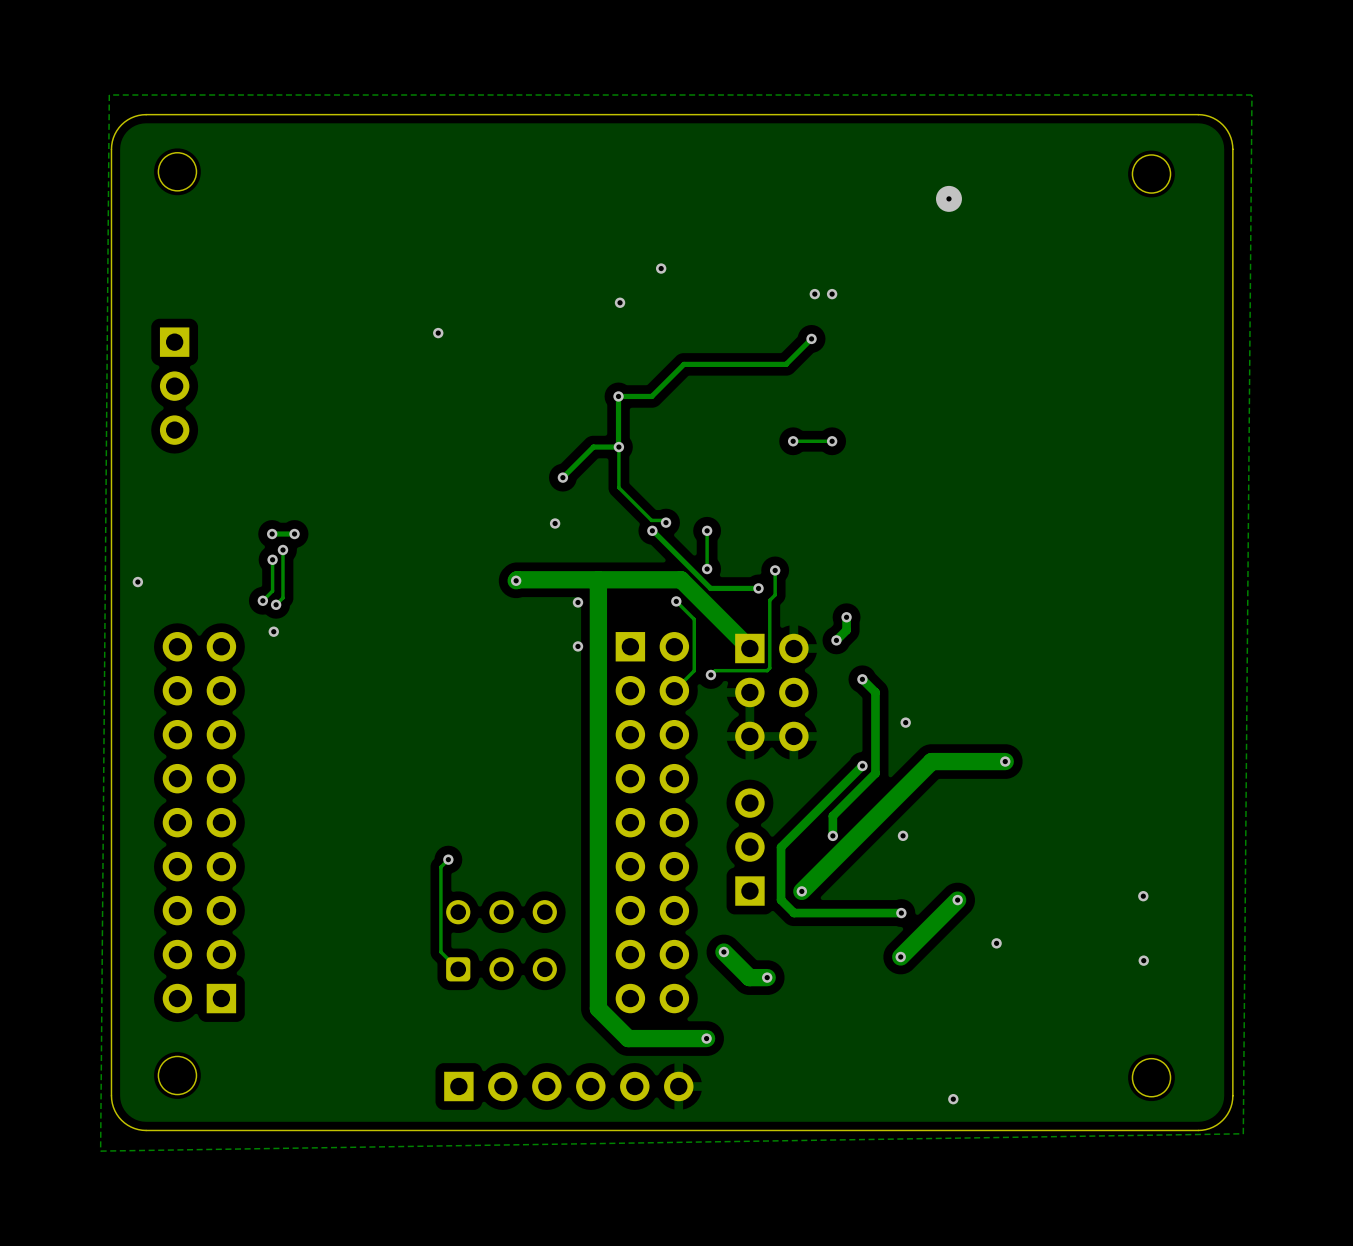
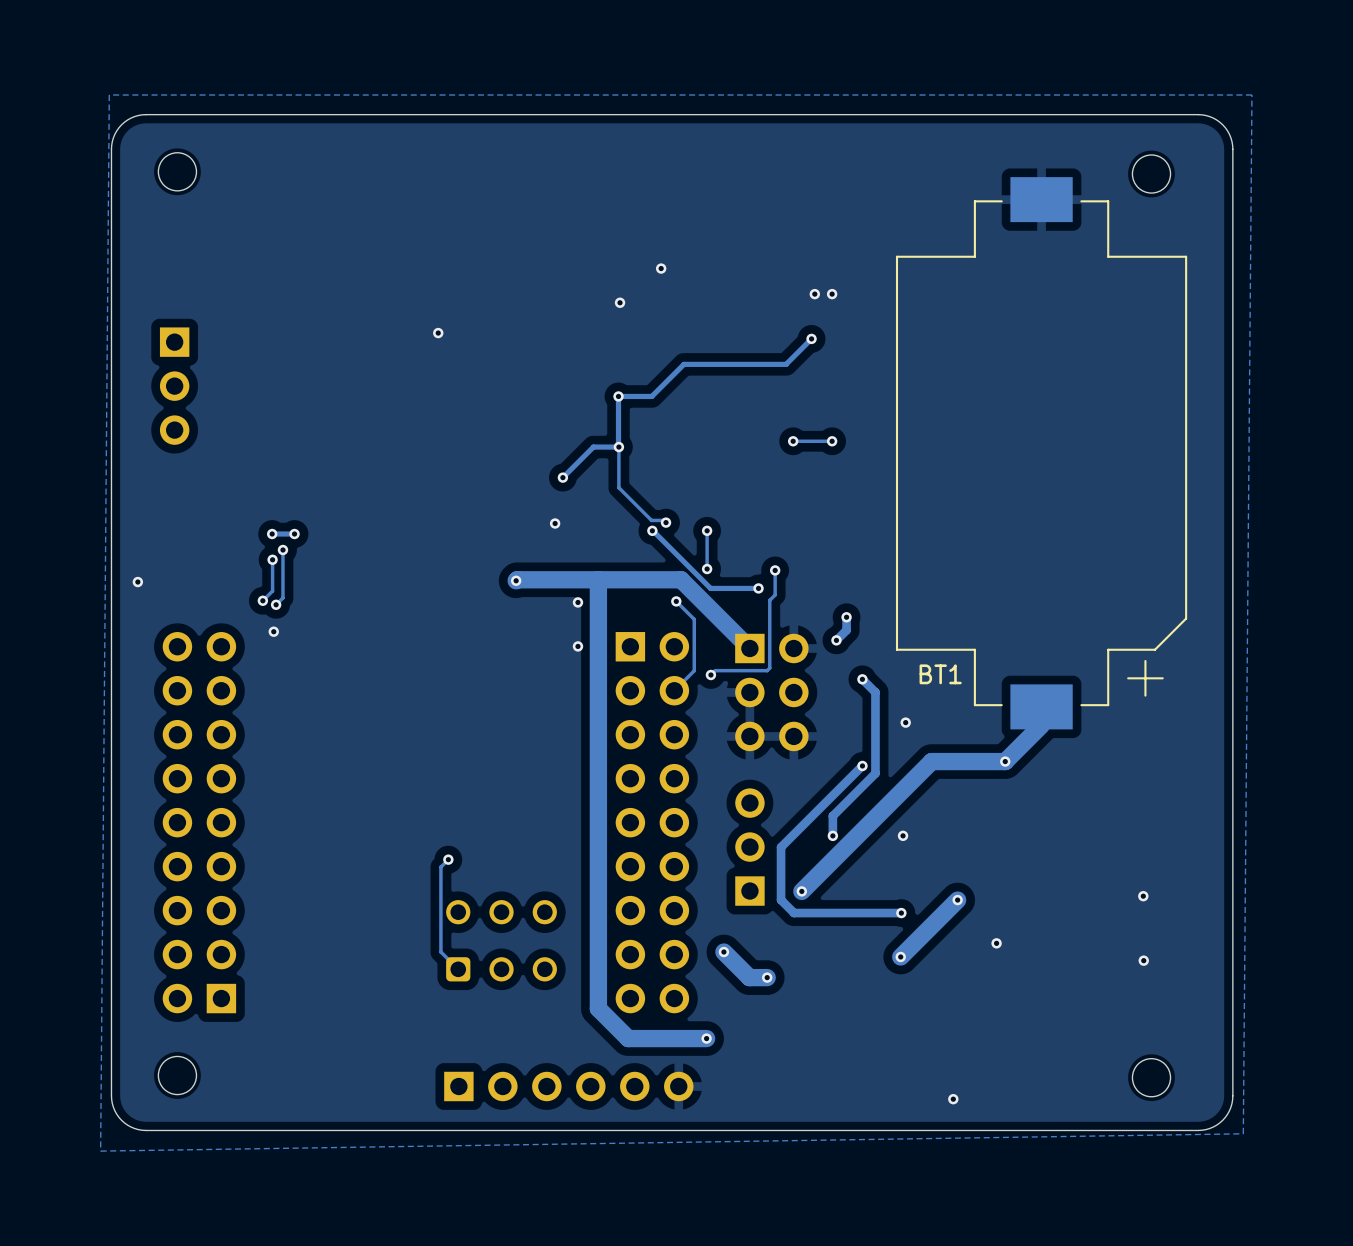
via: (948, 198) -> none
BT1: none -> (1041, 453)
track: none -> (1041, 706) (1041, 725) (1005, 761)

